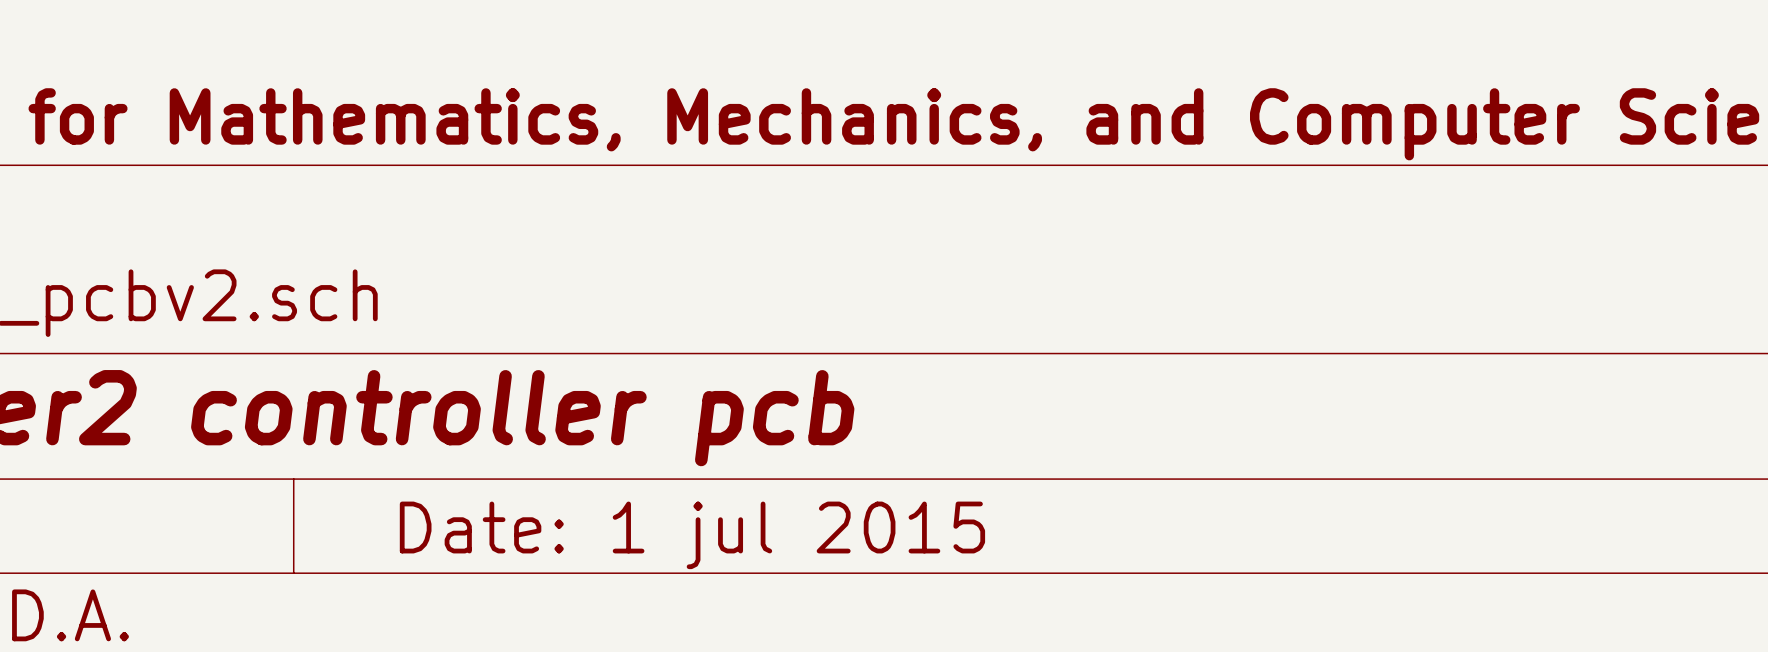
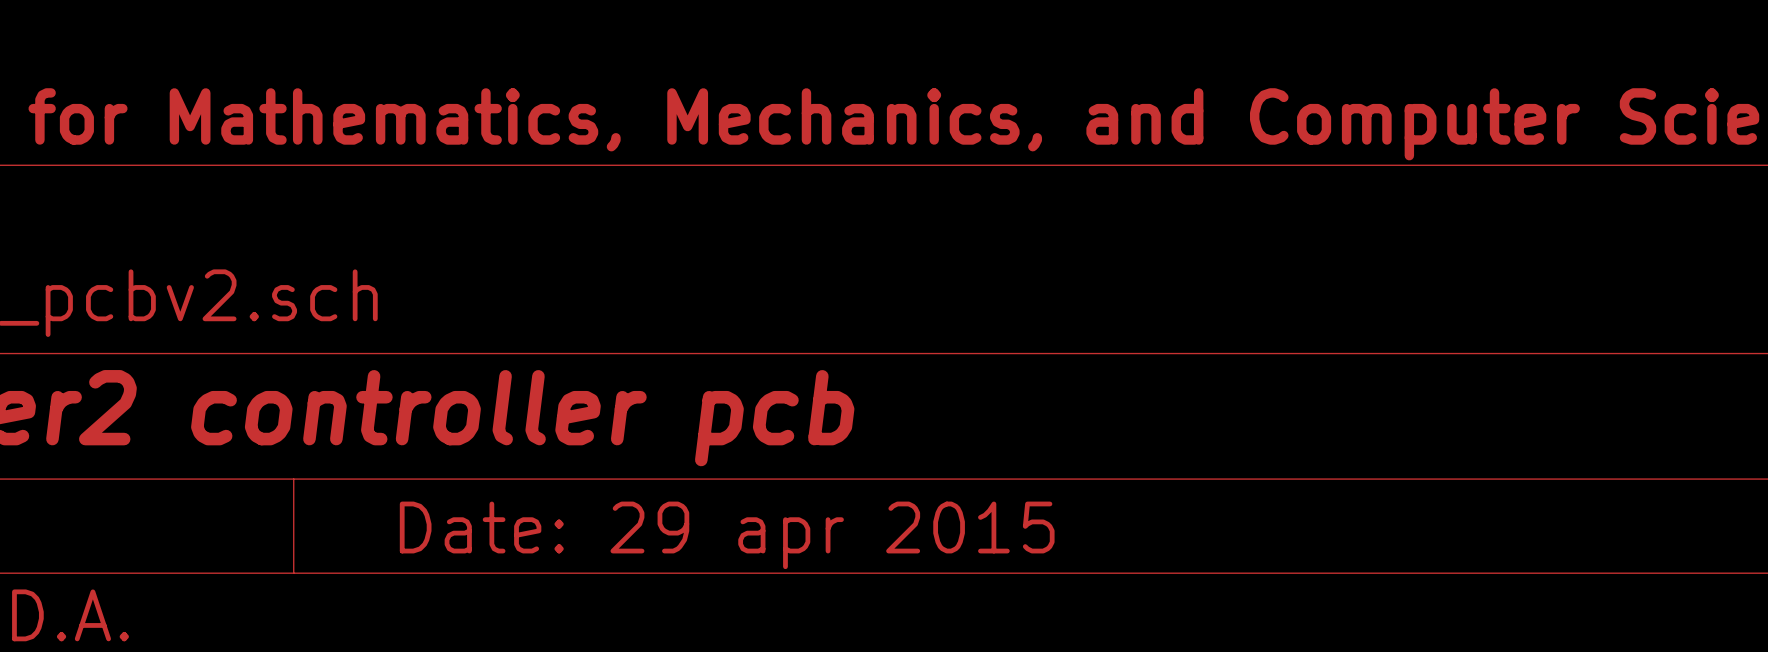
title block: Date: 1 jul 2015 (692, 535) -> Date: 29 apr 2015 (727, 535)

